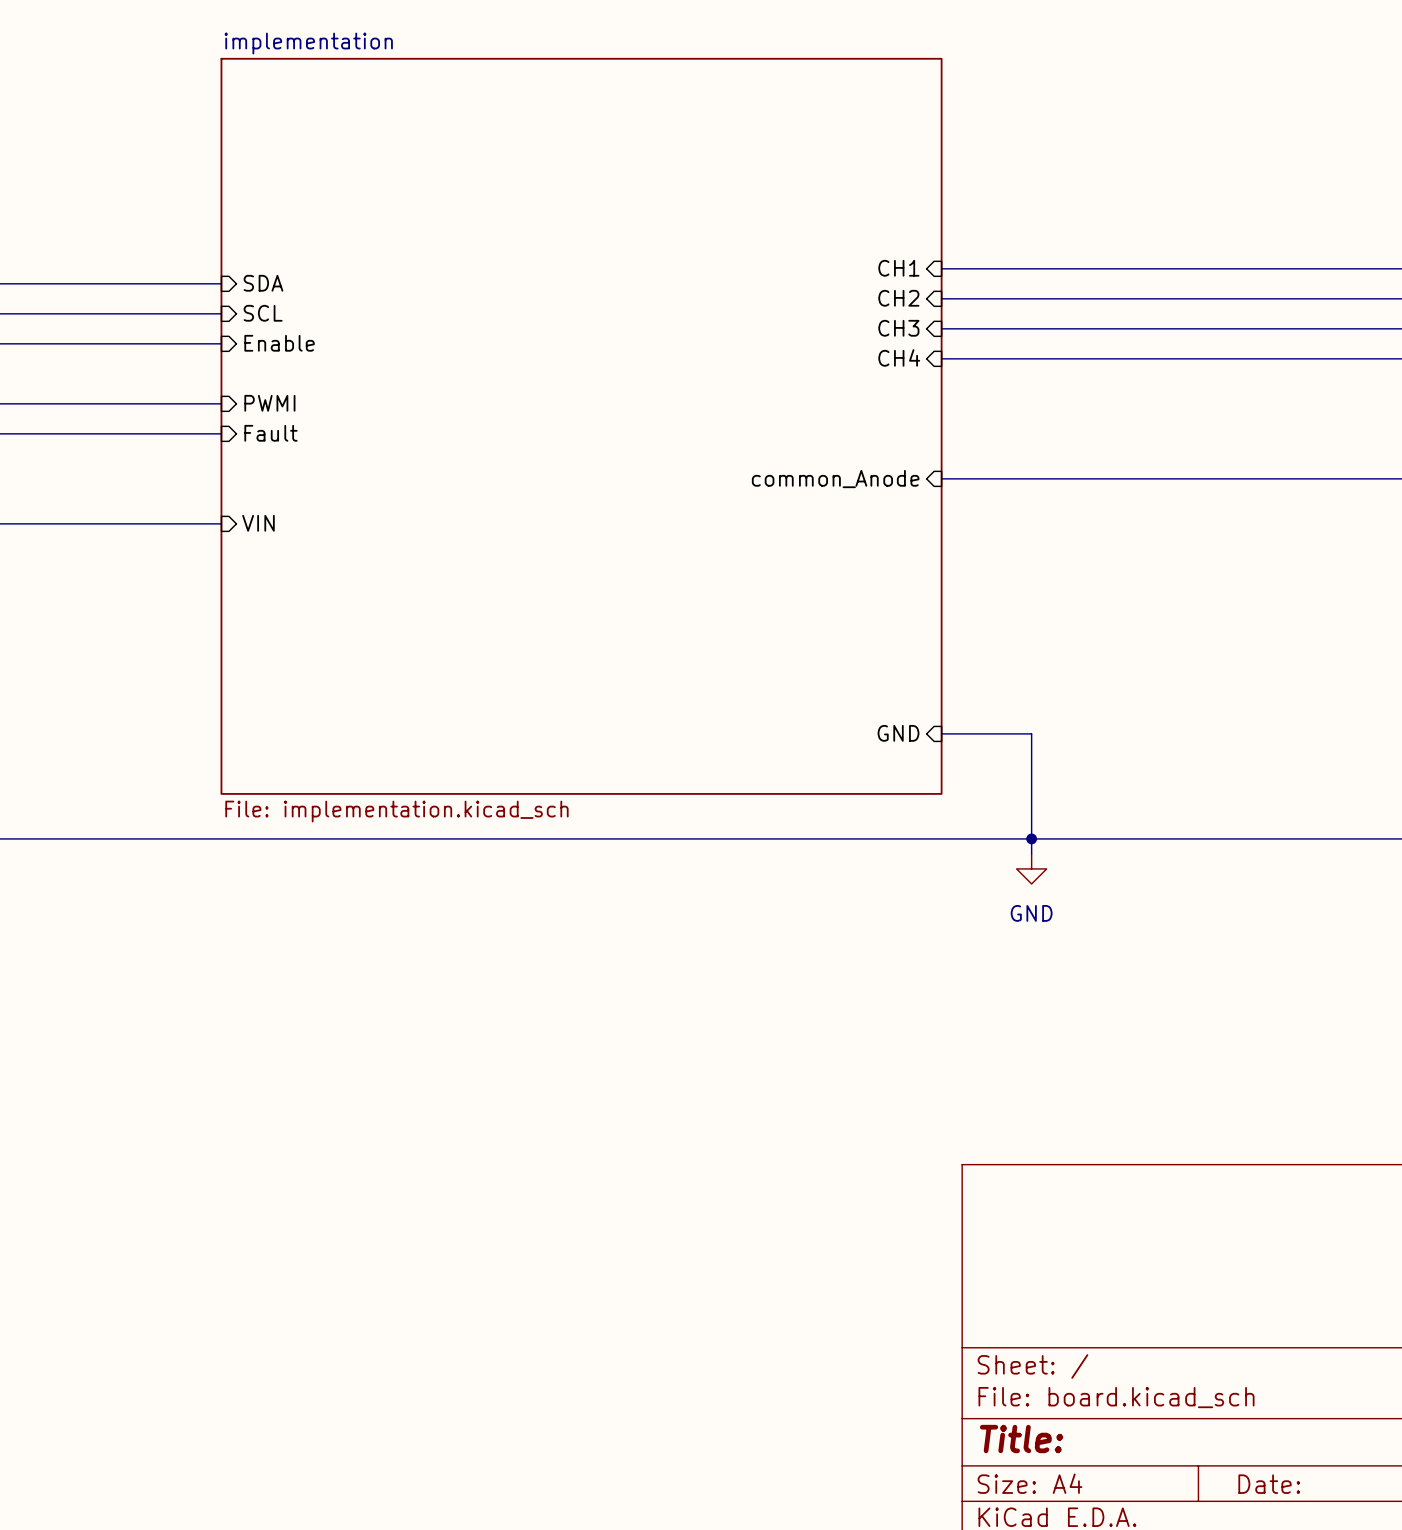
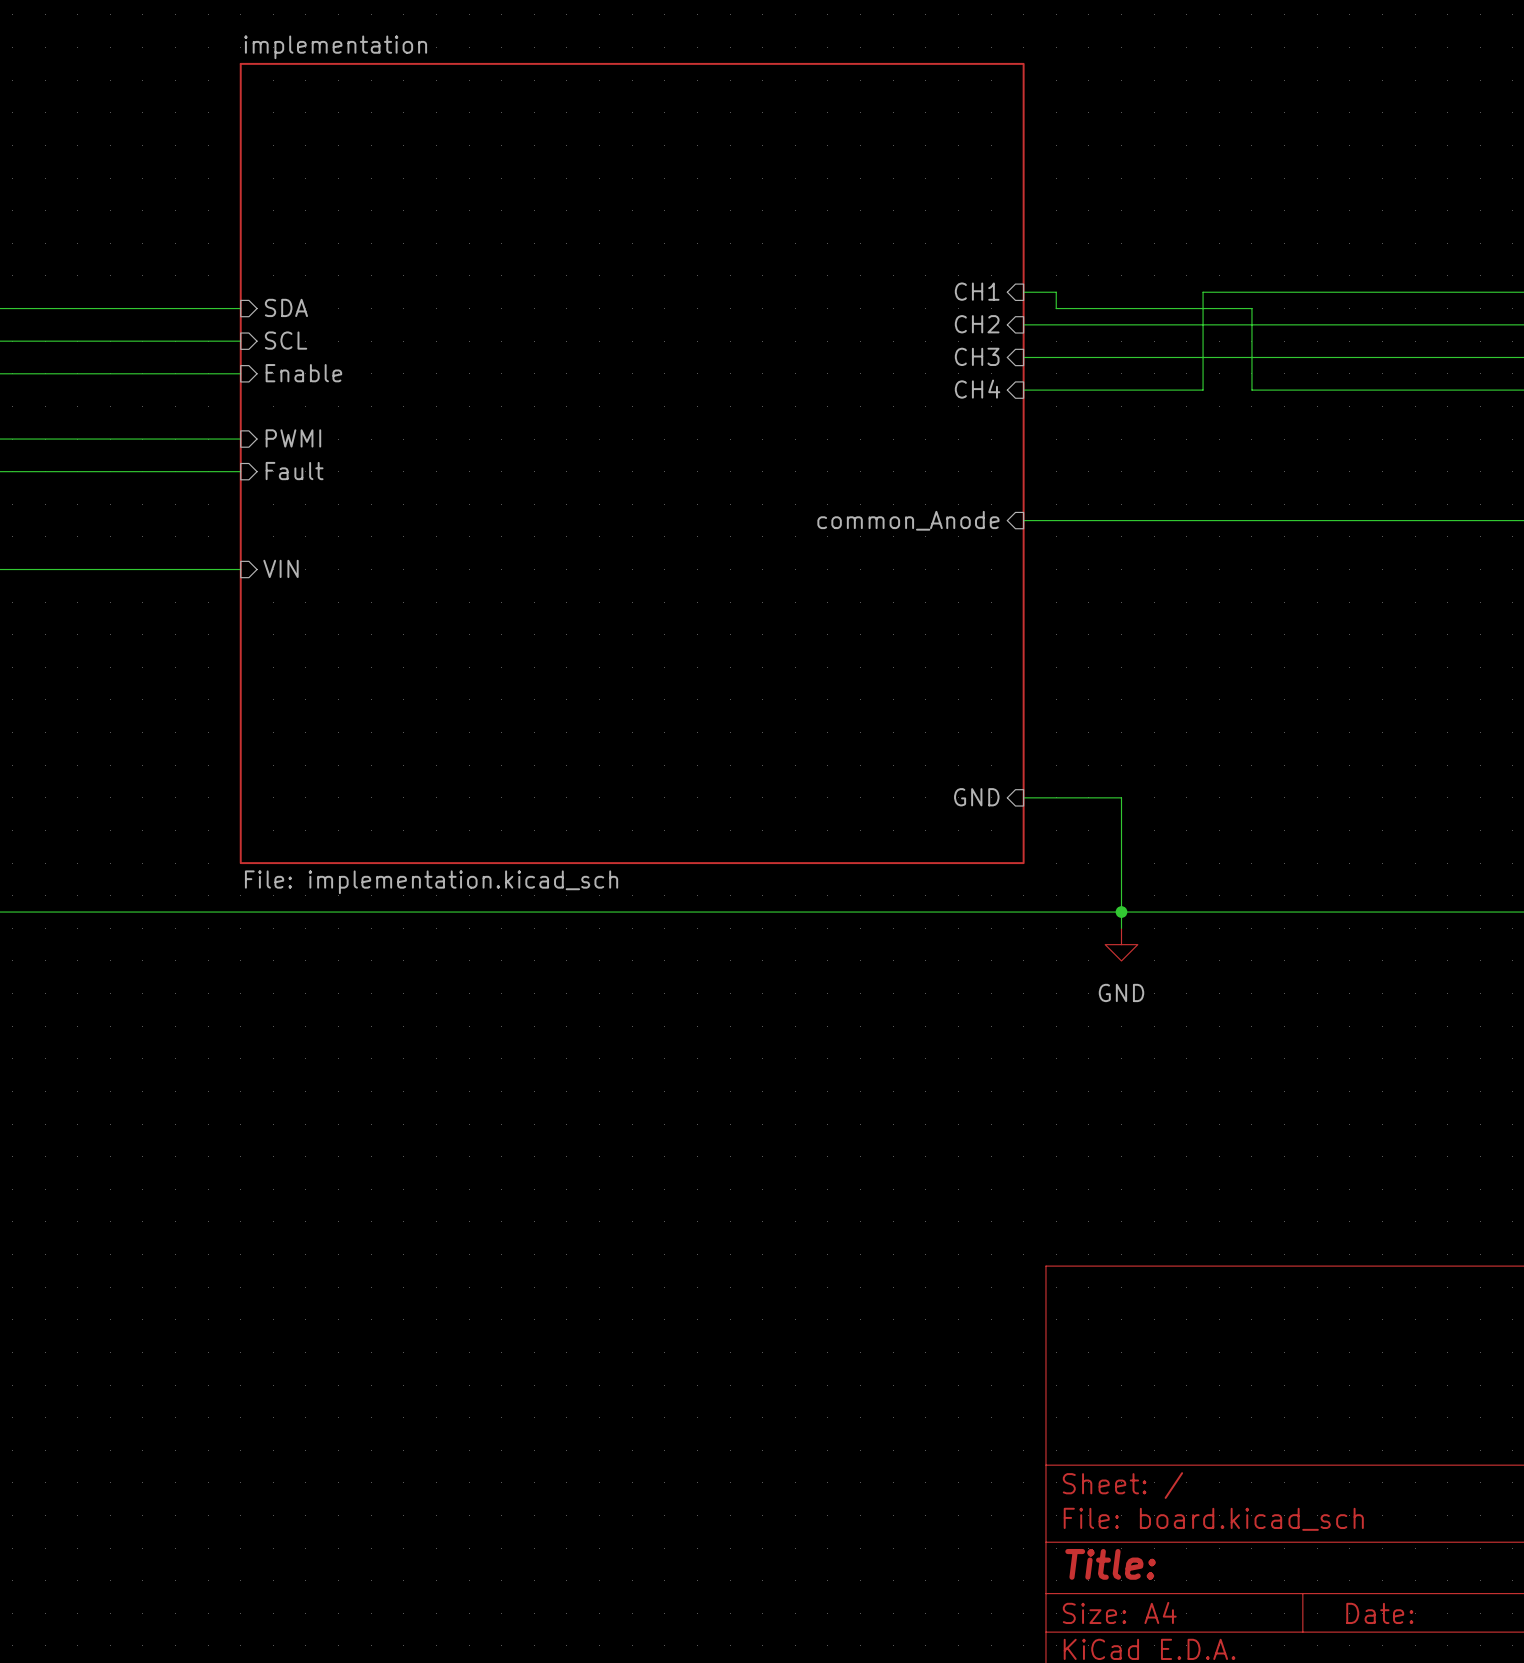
wire: (971, 268) (1106, 268) -> (1056, 292) (1056, 308) (1251, 308) (1251, 390)
wire: (1106, 358) (1151, 358) -> (1203, 390) (1203, 292)

